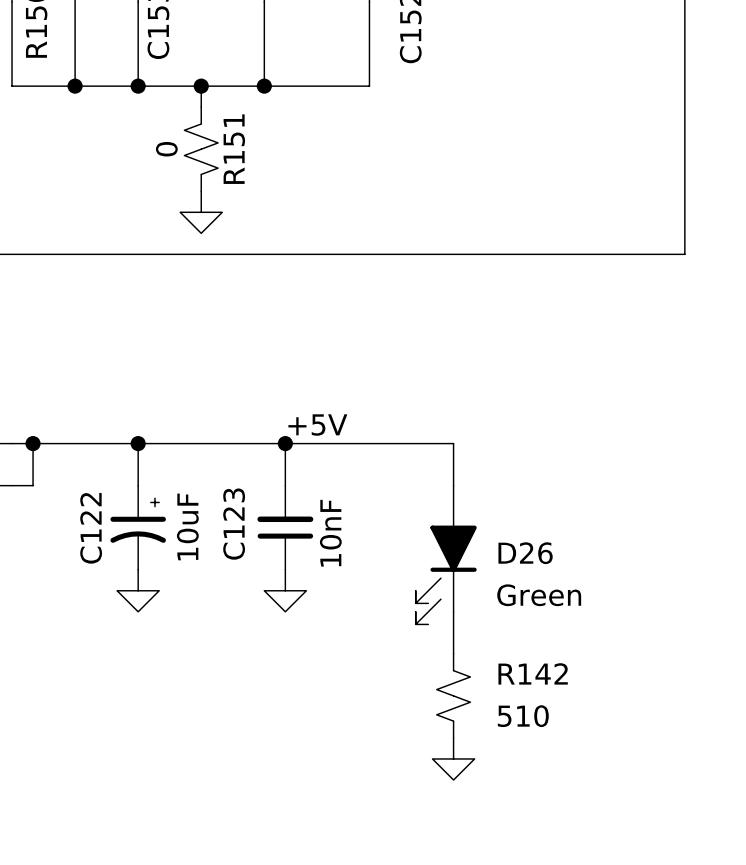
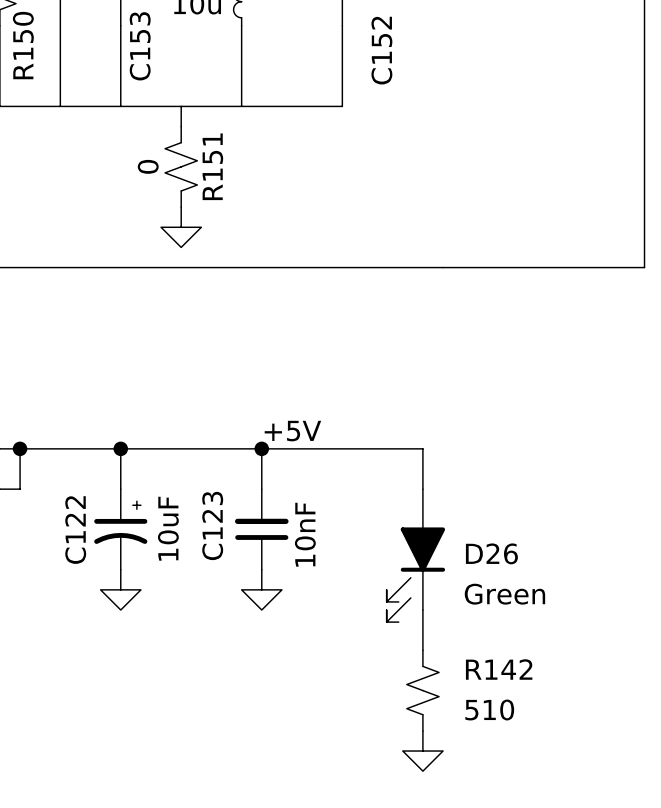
junction: (75, 86) -> none
junction: (138, 86) -> none
junction: (201, 86) -> none
junction: (264, 86) -> none

